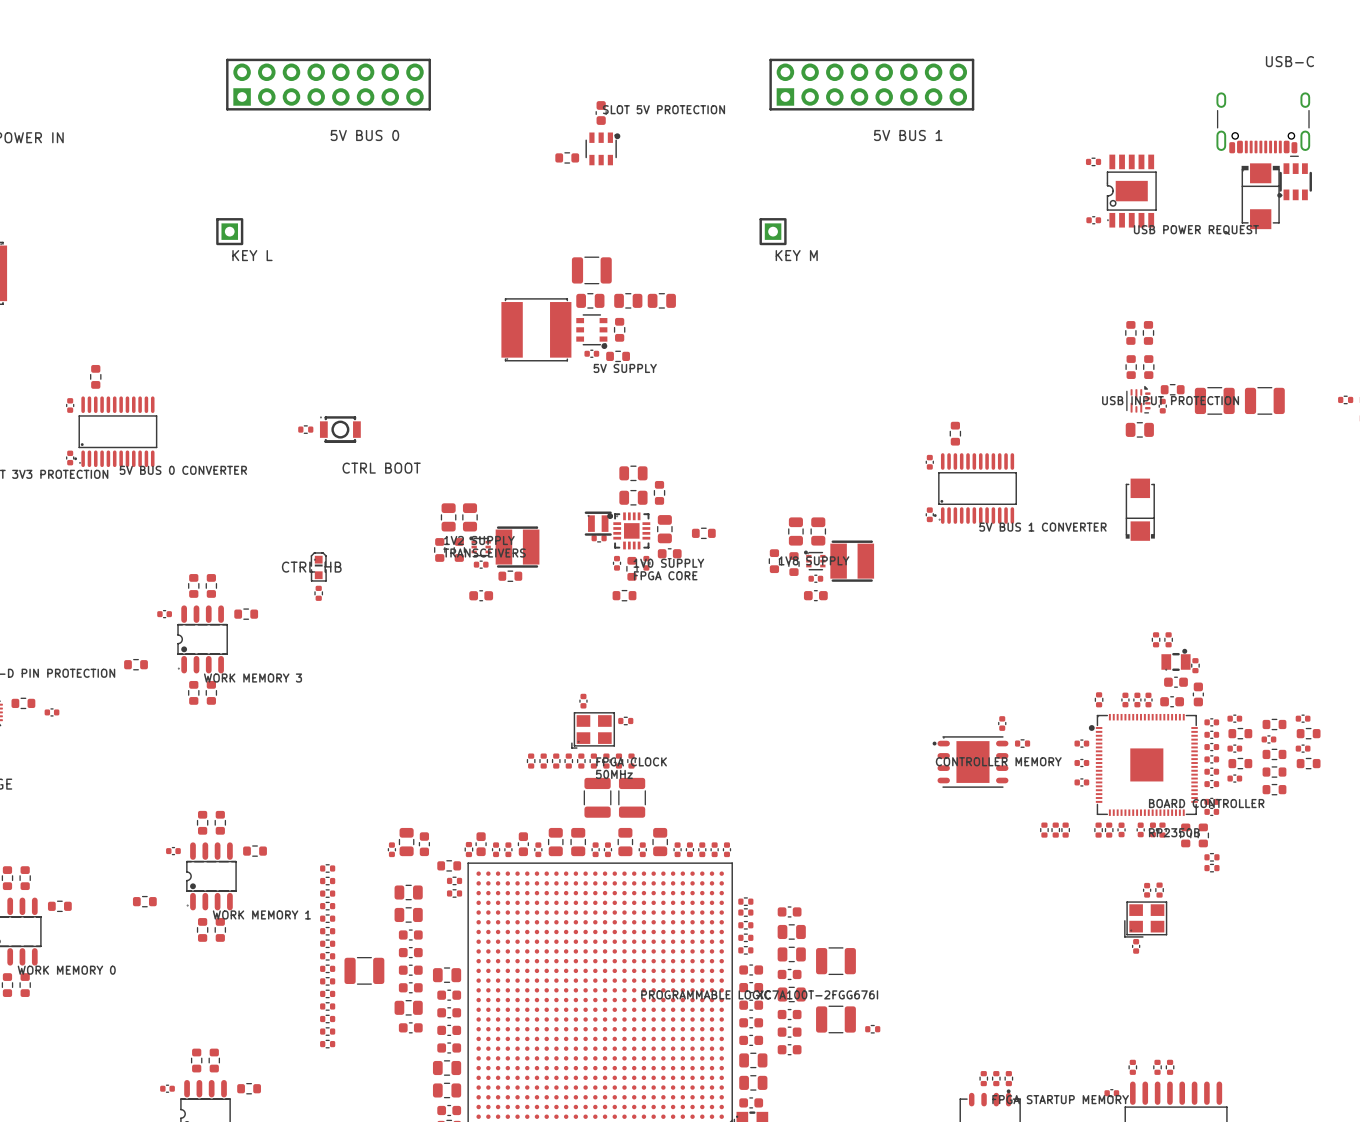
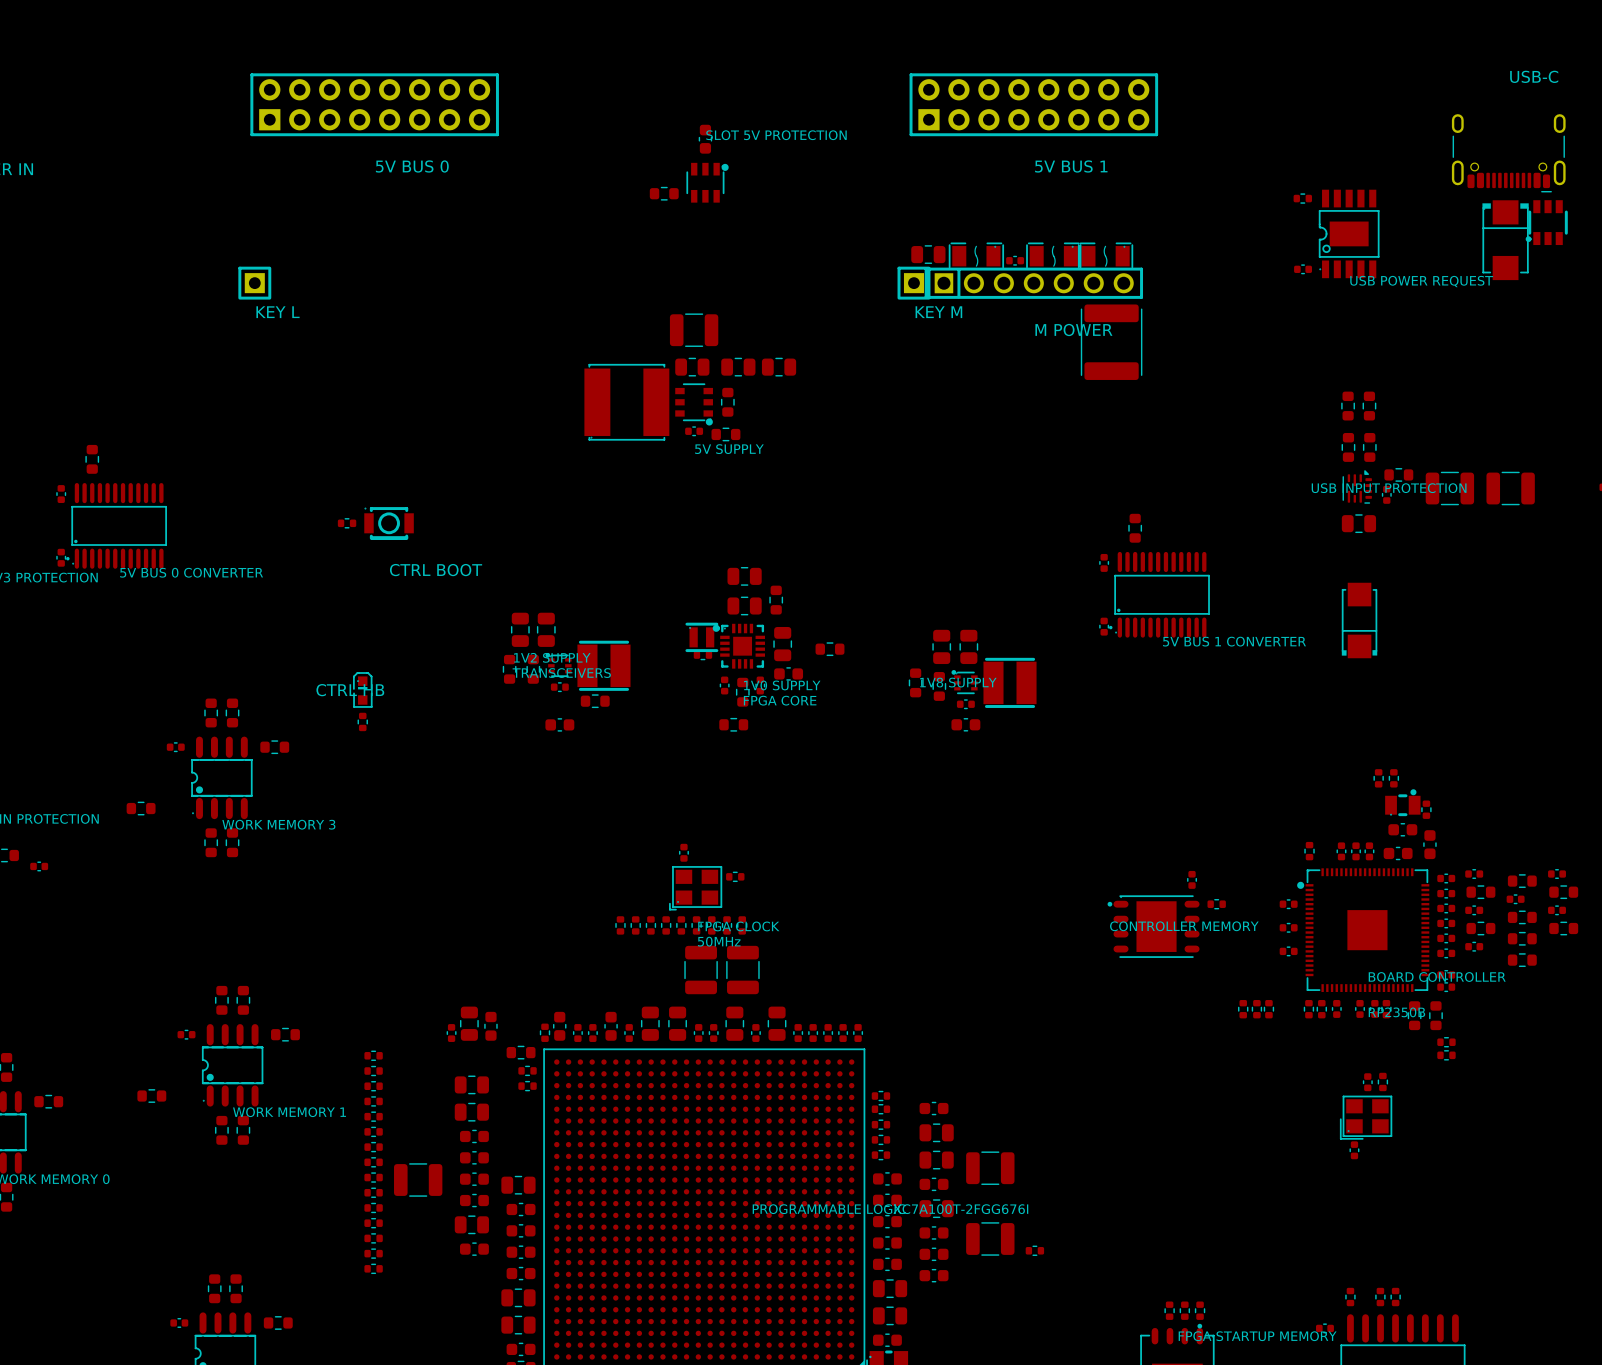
part: none -> (928, 254)
part: none -> (976, 256)
part: none -> (1053, 256)
part: none -> (1105, 256)
part: none -> (1015, 260)
part: none -> (1033, 283)
part: none -> (1111, 342)

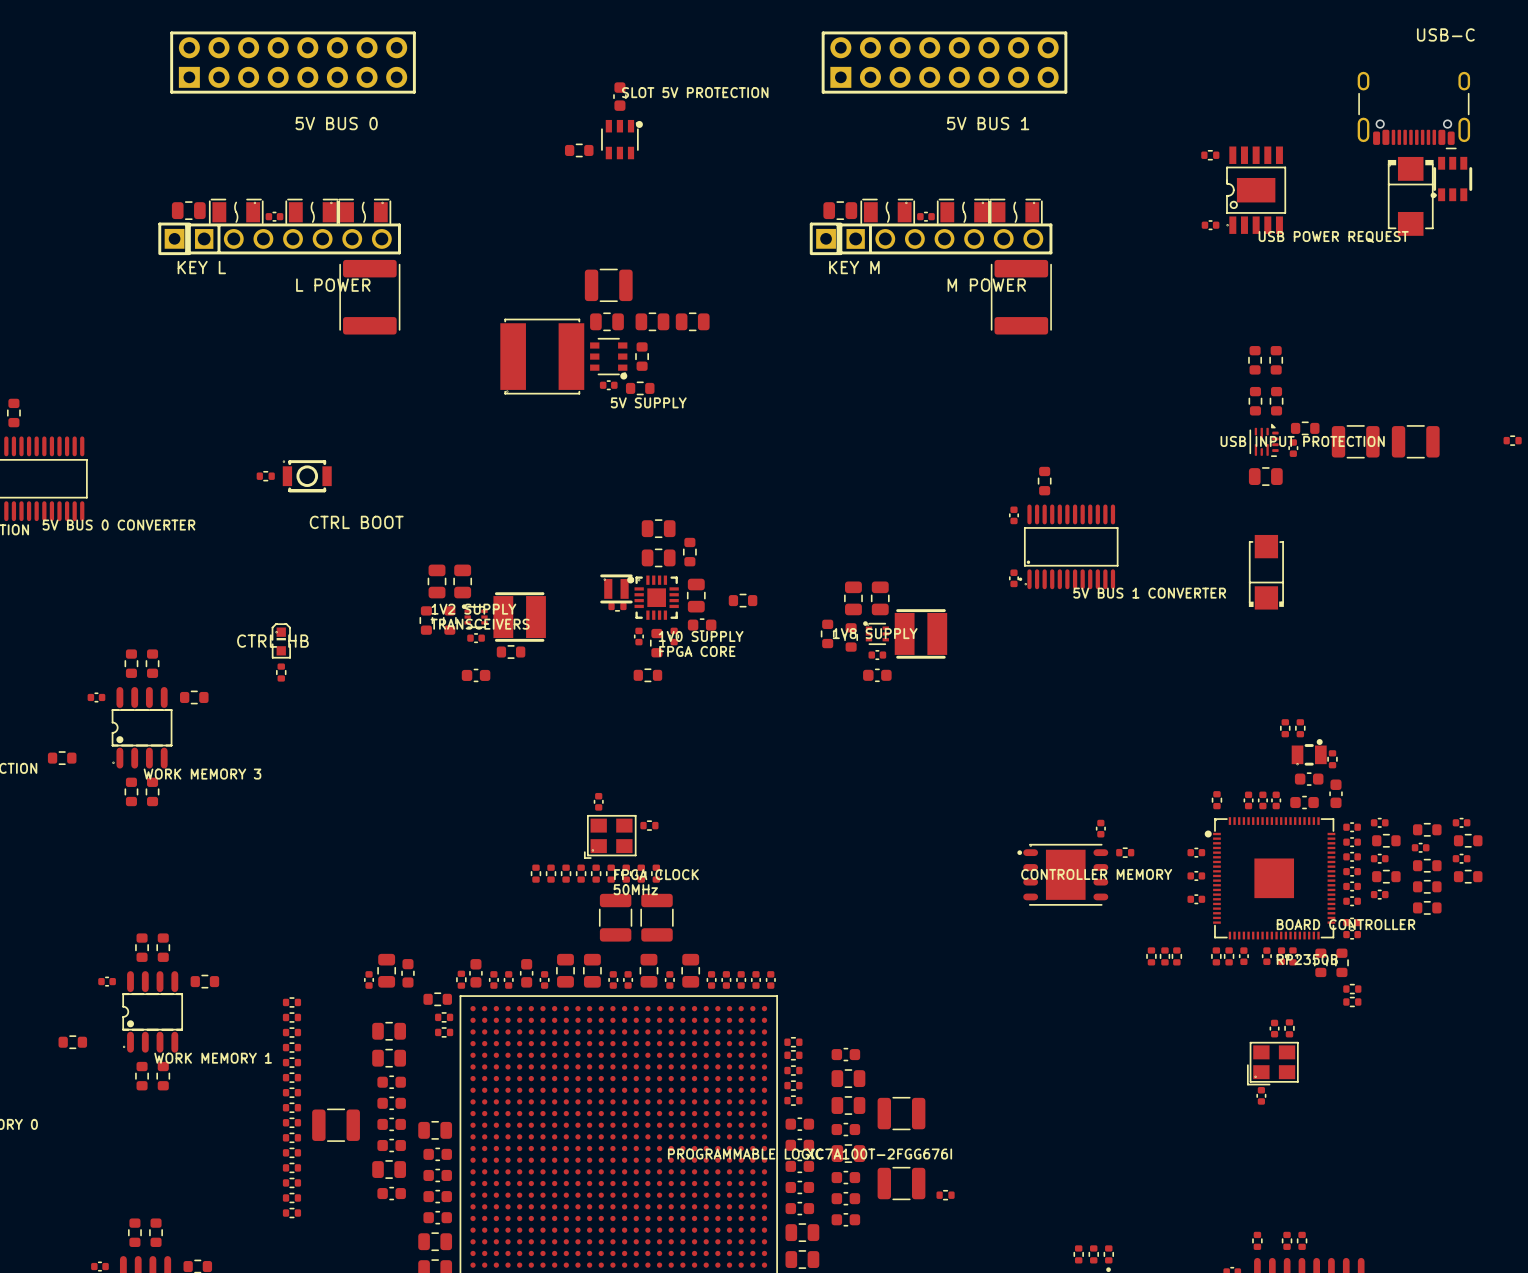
part: none -> (188, 210)
part: none -> (236, 212)
part: none -> (312, 212)
part: none -> (363, 212)
part: none -> (274, 216)
part: none -> (293, 238)
part: none -> (369, 297)

